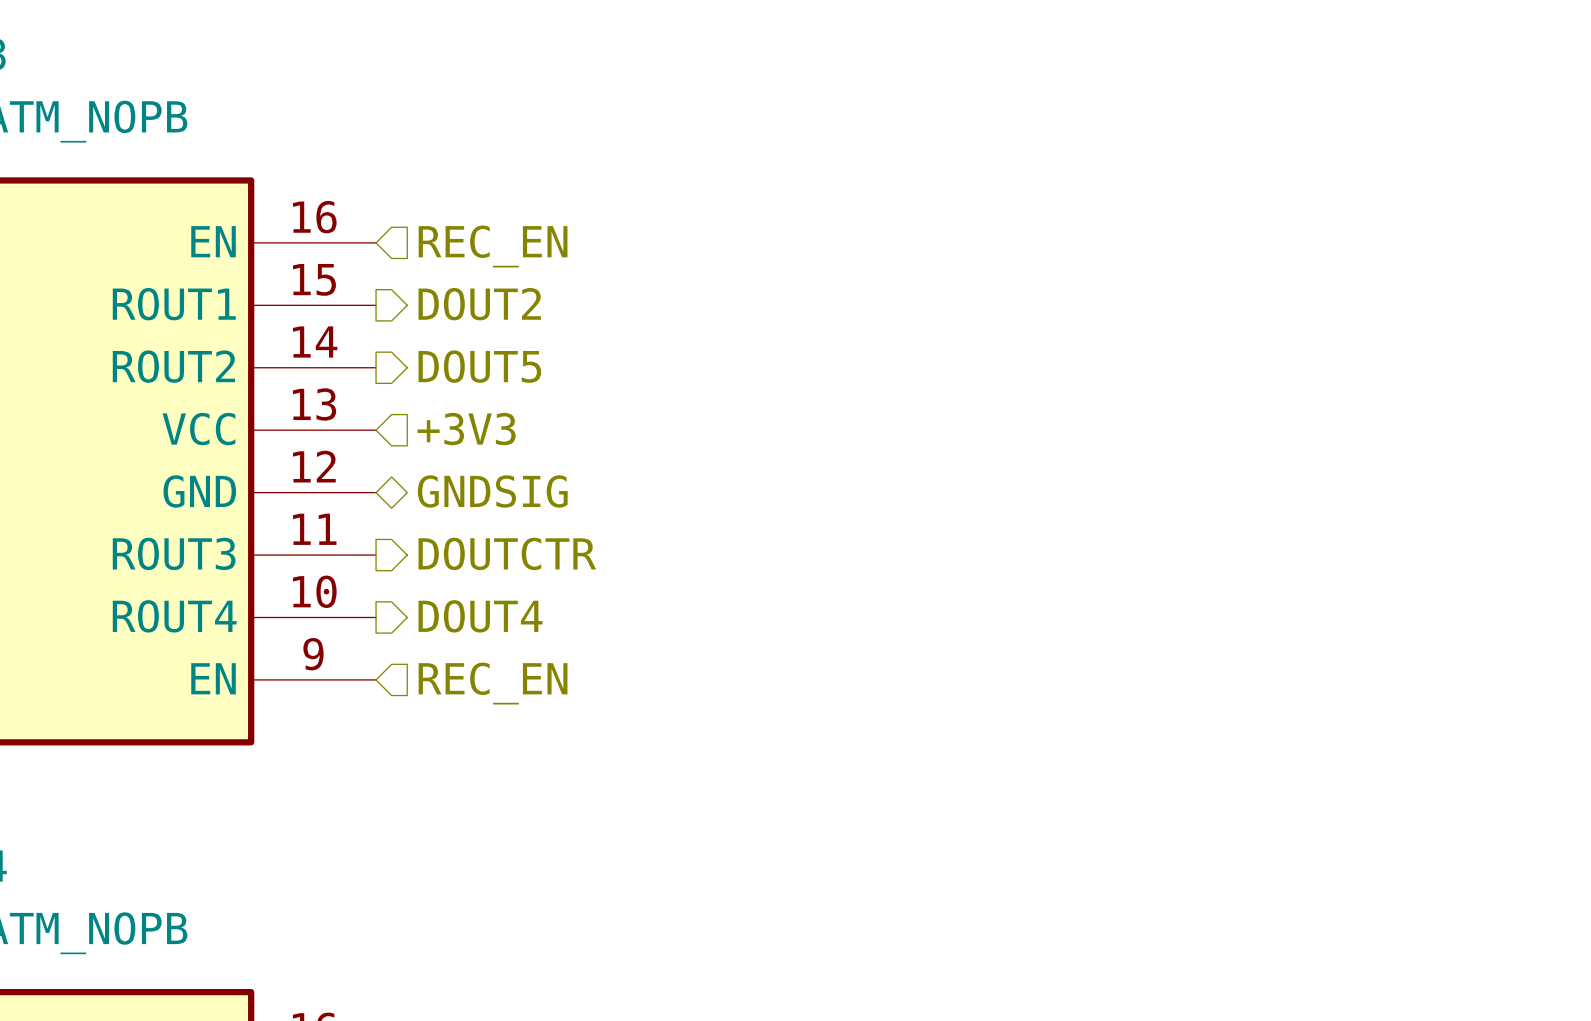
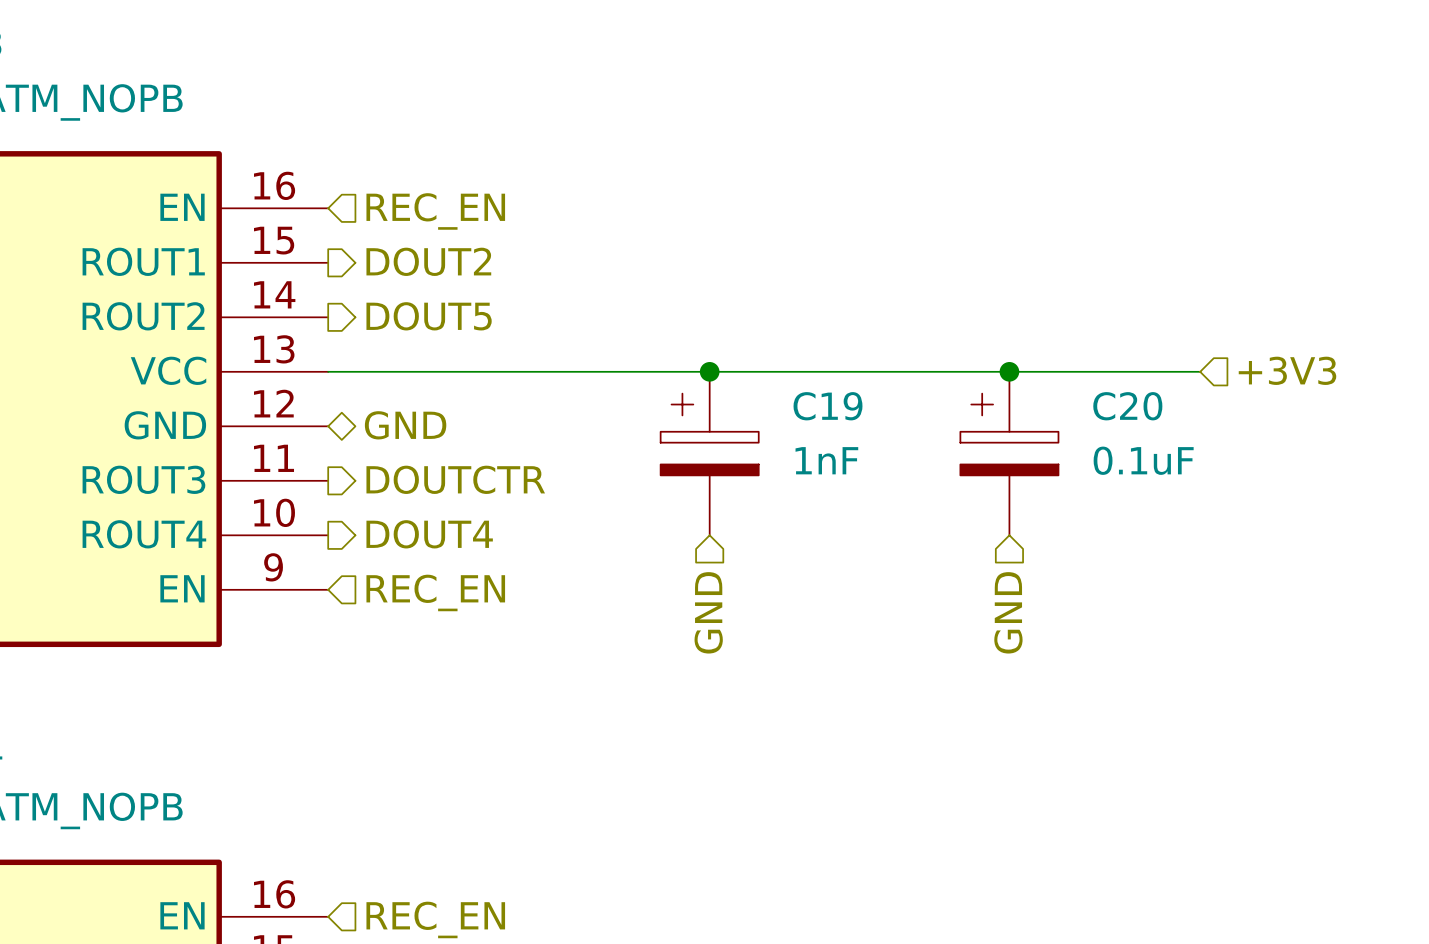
hierarchical label: +3V3 (466, 429) -> none
hierarchical label: none -> +3V3 (1287, 370)
wire: none -> (328, 371) (1200, 371)
junction: none -> (709, 371)
junction: none -> (1009, 371)
hierarchical label: GNDSIG (492, 491) -> GND (405, 425)
C19: none -> 1nF (709, 453)
C20: none -> 0.1uF (1009, 453)
hierarchical label: none -> GND (708, 612)
hierarchical label: none -> GND (1008, 612)

